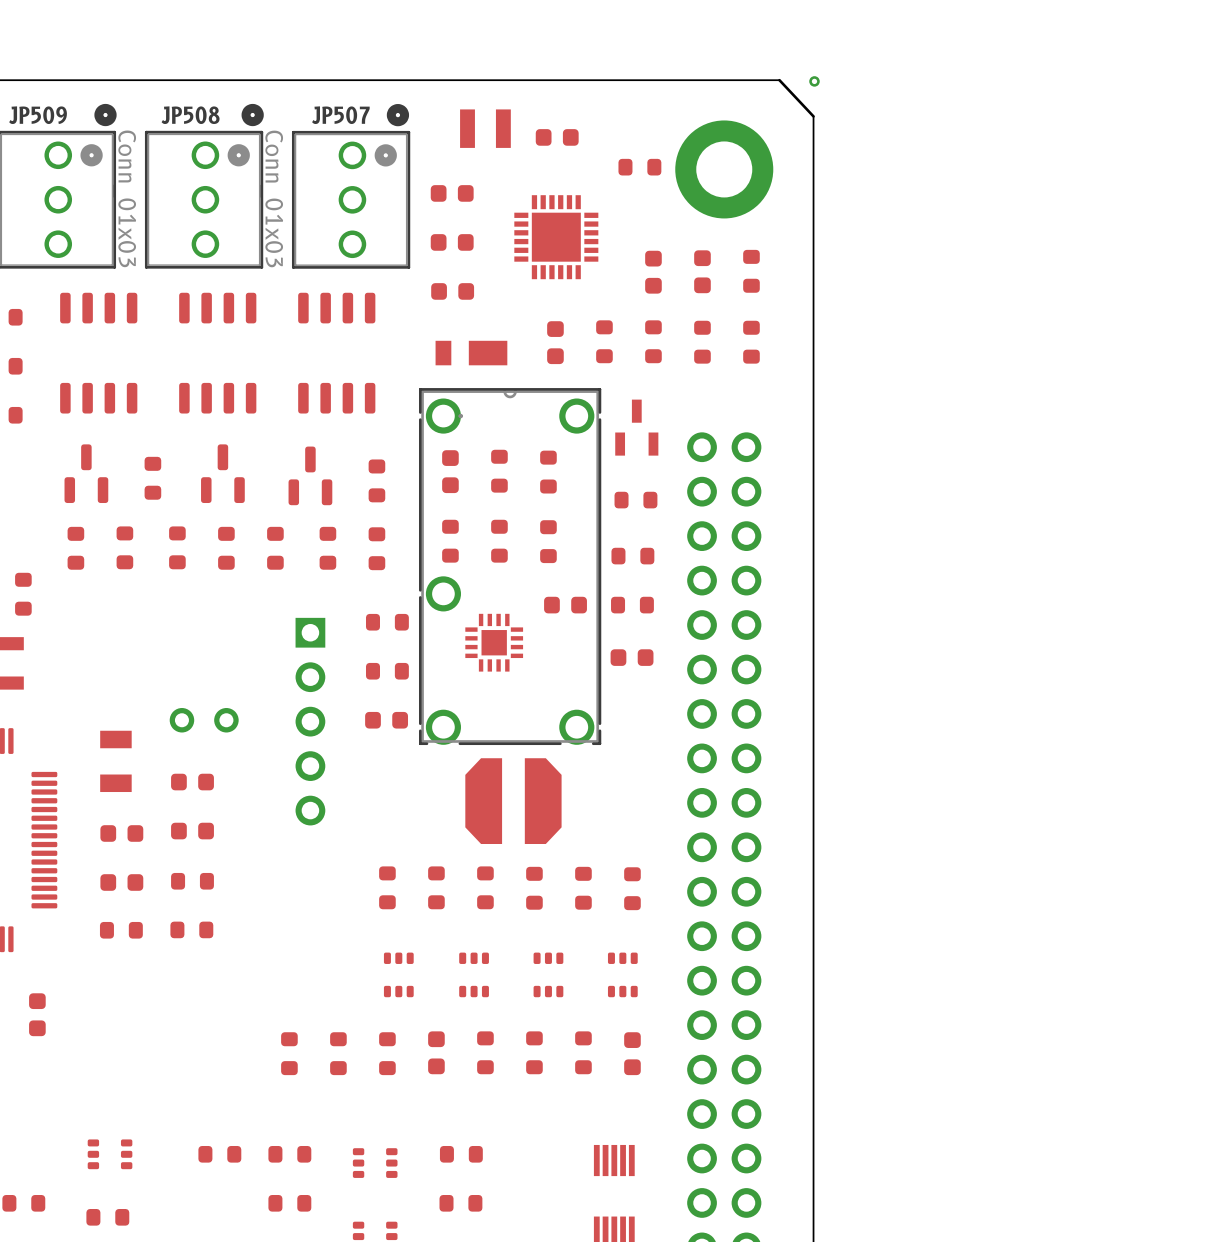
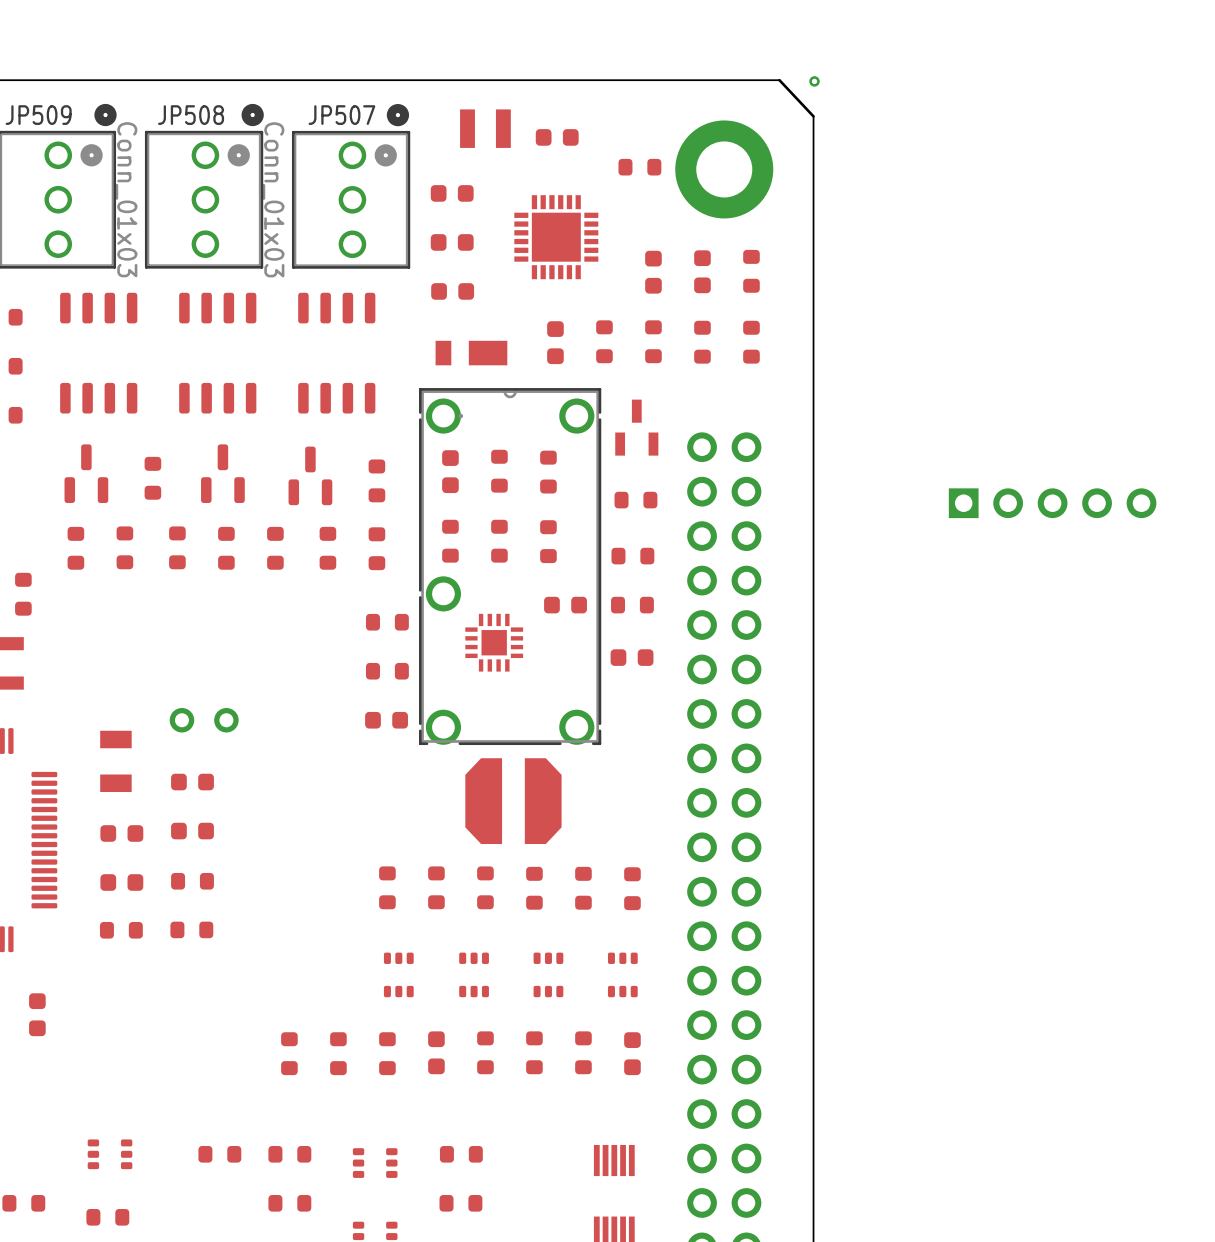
part: none -> (1052, 503)
part: (310, 721) -> none

